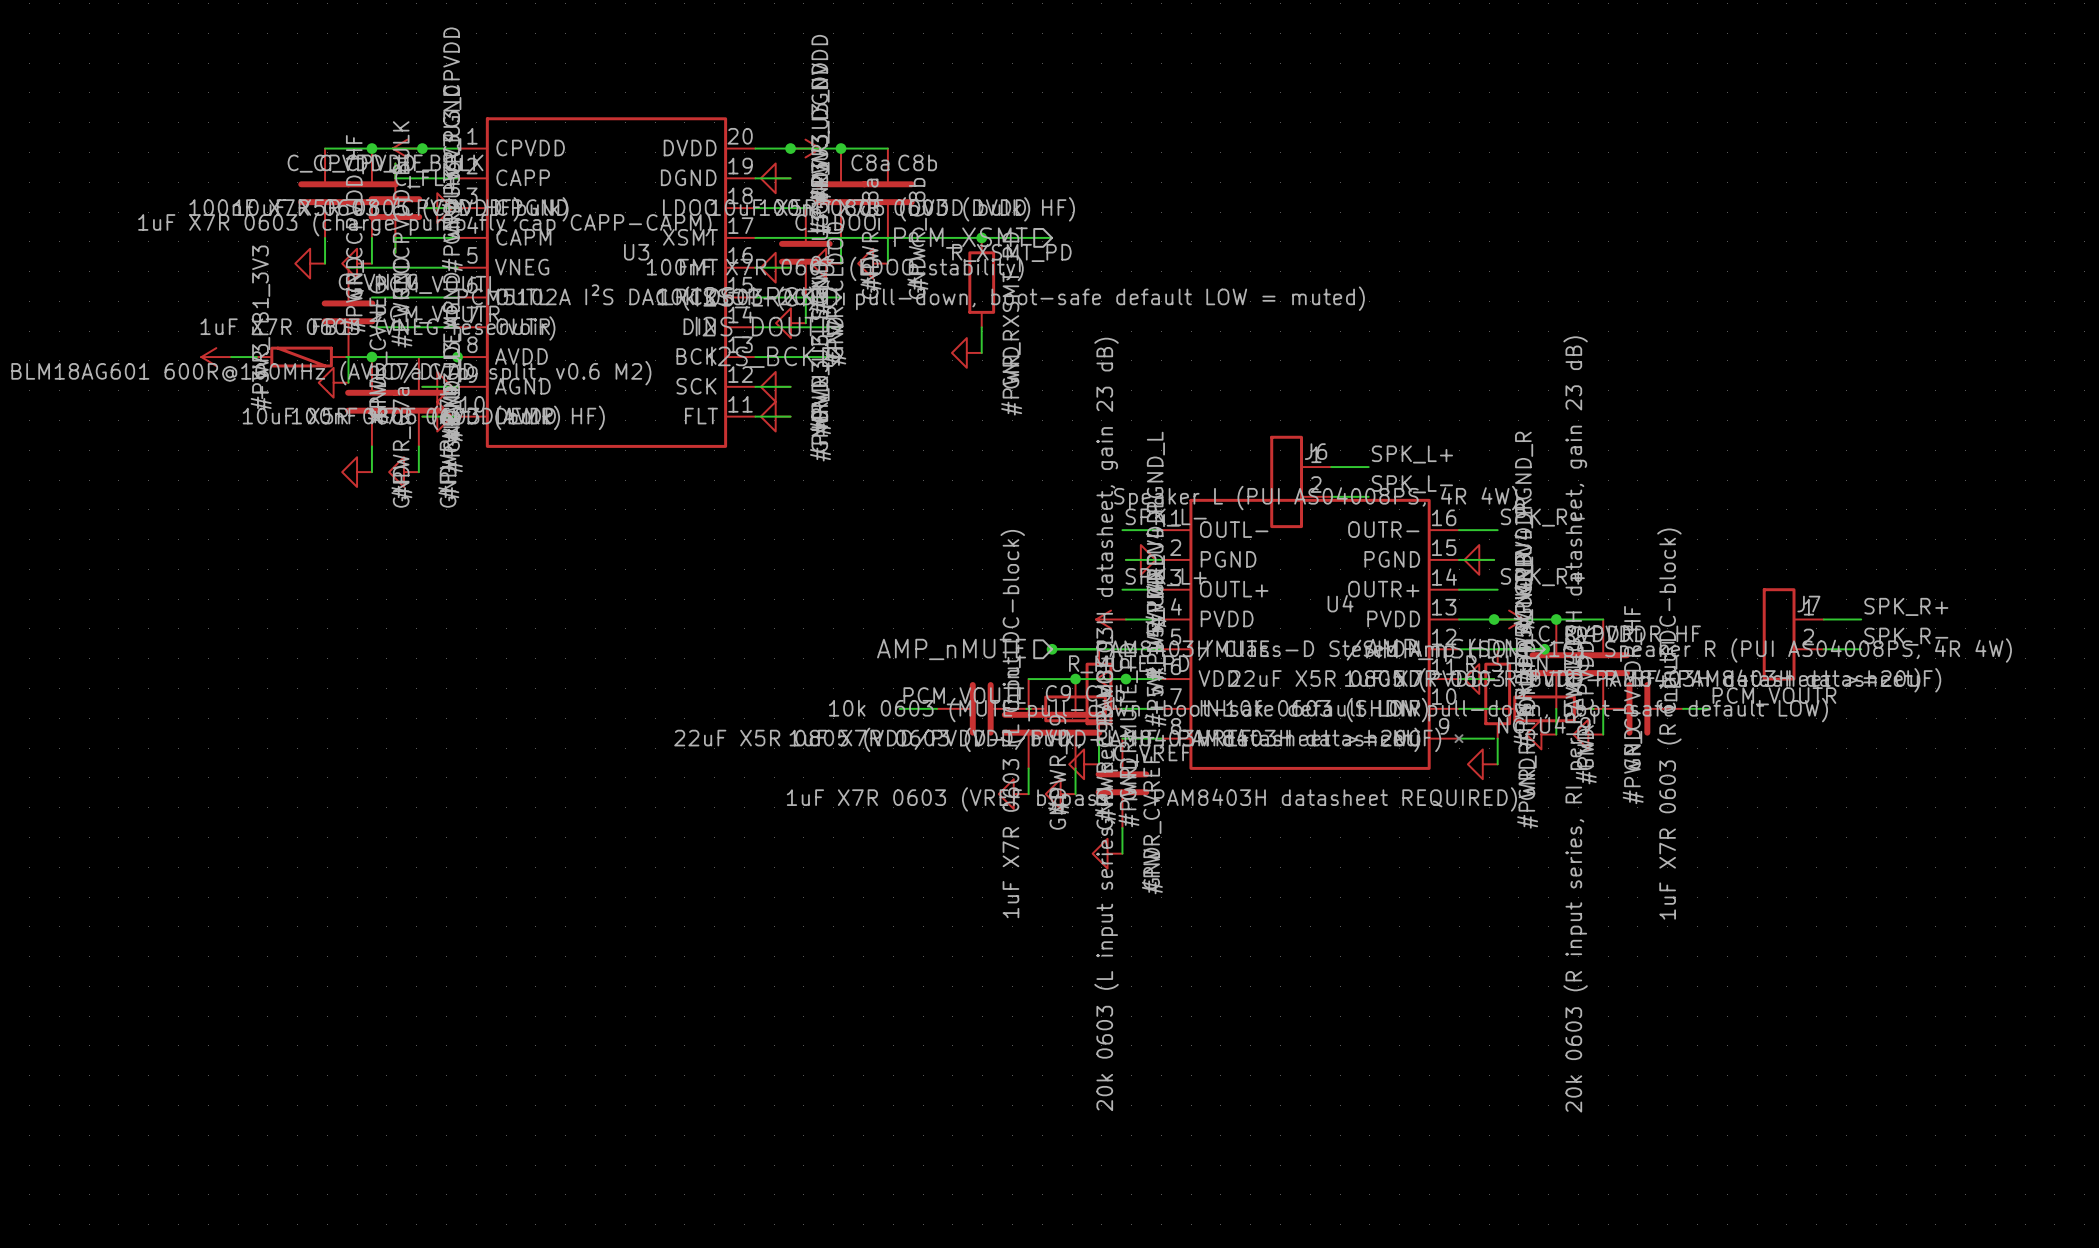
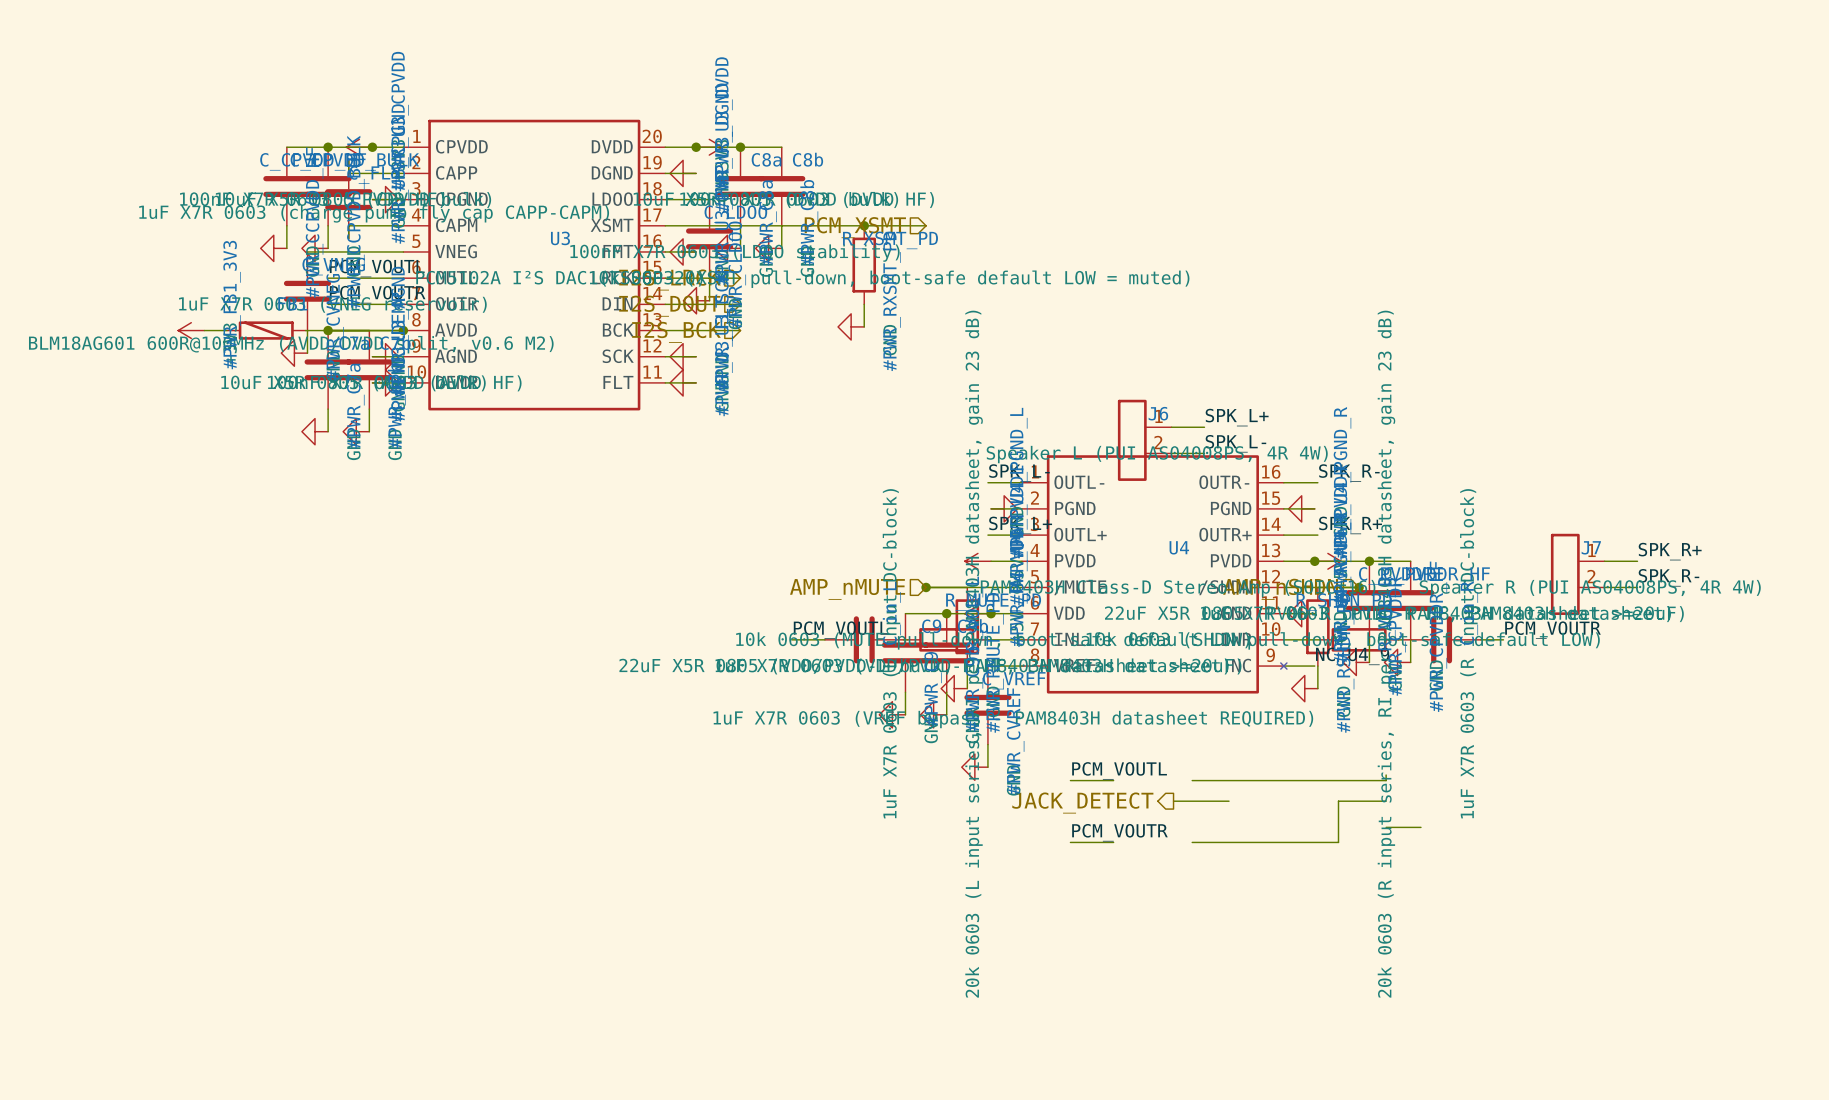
label: none -> PCM_VOUTL (1119, 770)
wire: none -> (1386, 775) (1386, 780) (1192, 780)
wire: none -> (1070, 780) (1113, 780)
hierarchical label: none -> JACK_DETECT (1082, 803)
wire: none -> (1173, 801) (1229, 801)
wire: none -> (1386, 801) (1338, 801) (1338, 842) (1192, 842)
wire: none -> (1386, 827) (1420, 827)
label: none -> PCM_VOUTR (1119, 832)
wire: none -> (1070, 842) (1113, 842)

